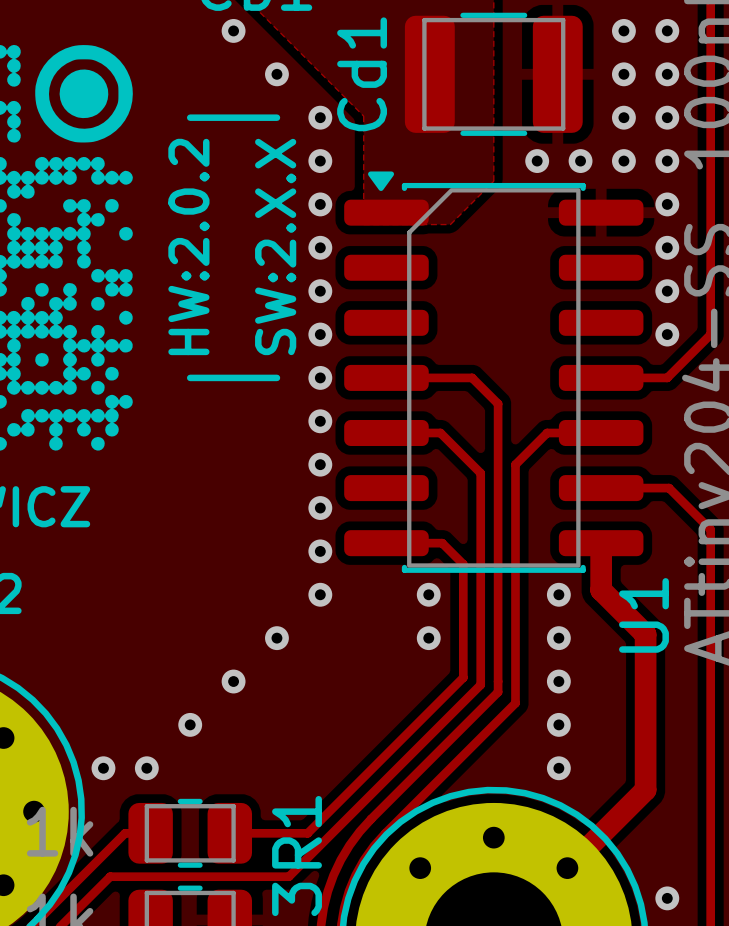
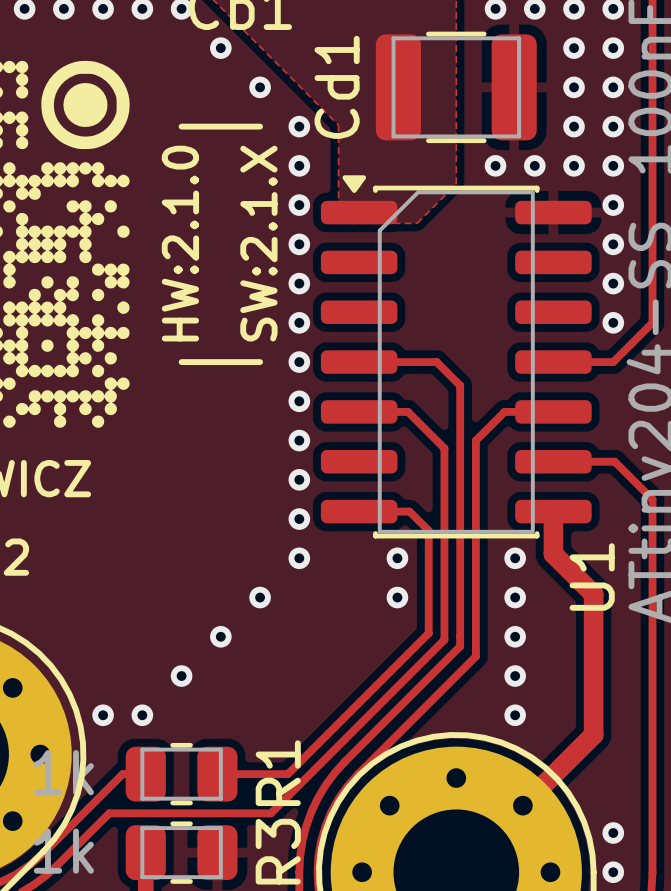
text: HW:2.0.2 (188, 246) -> HW:2.1.0 (180, 243)
text: SW:2.X.X (275, 246) -> SW:2.1.X (258, 243)

